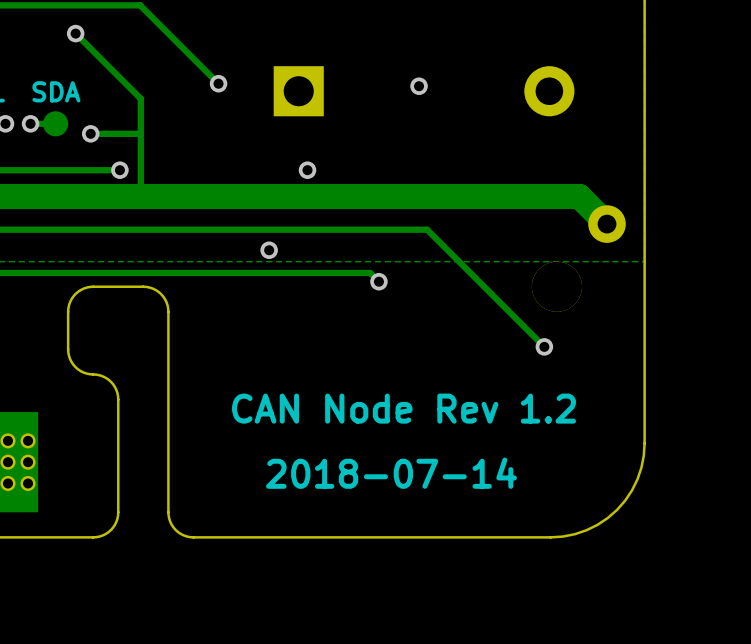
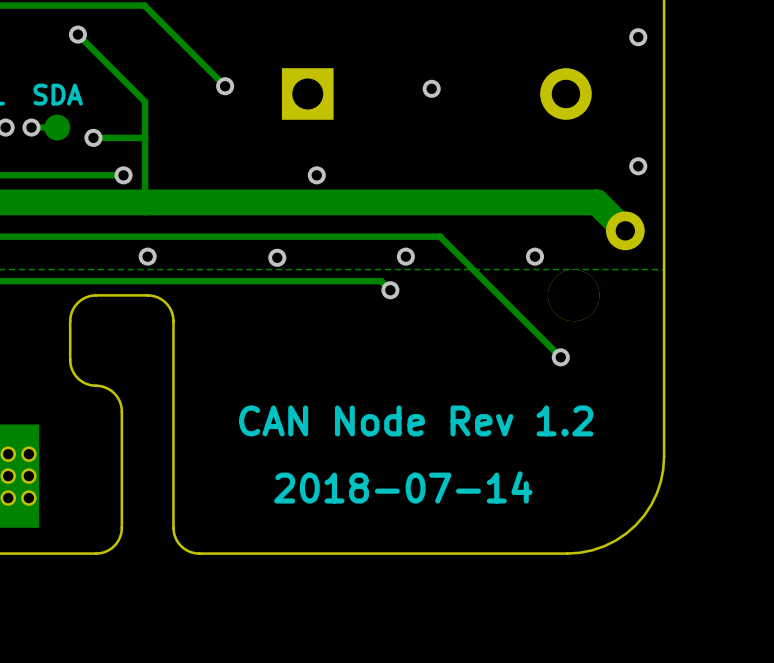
via: none -> (638, 37)
via: none -> (638, 166)
via: none -> (147, 256)
via: none -> (405, 256)
via: none -> (534, 256)

